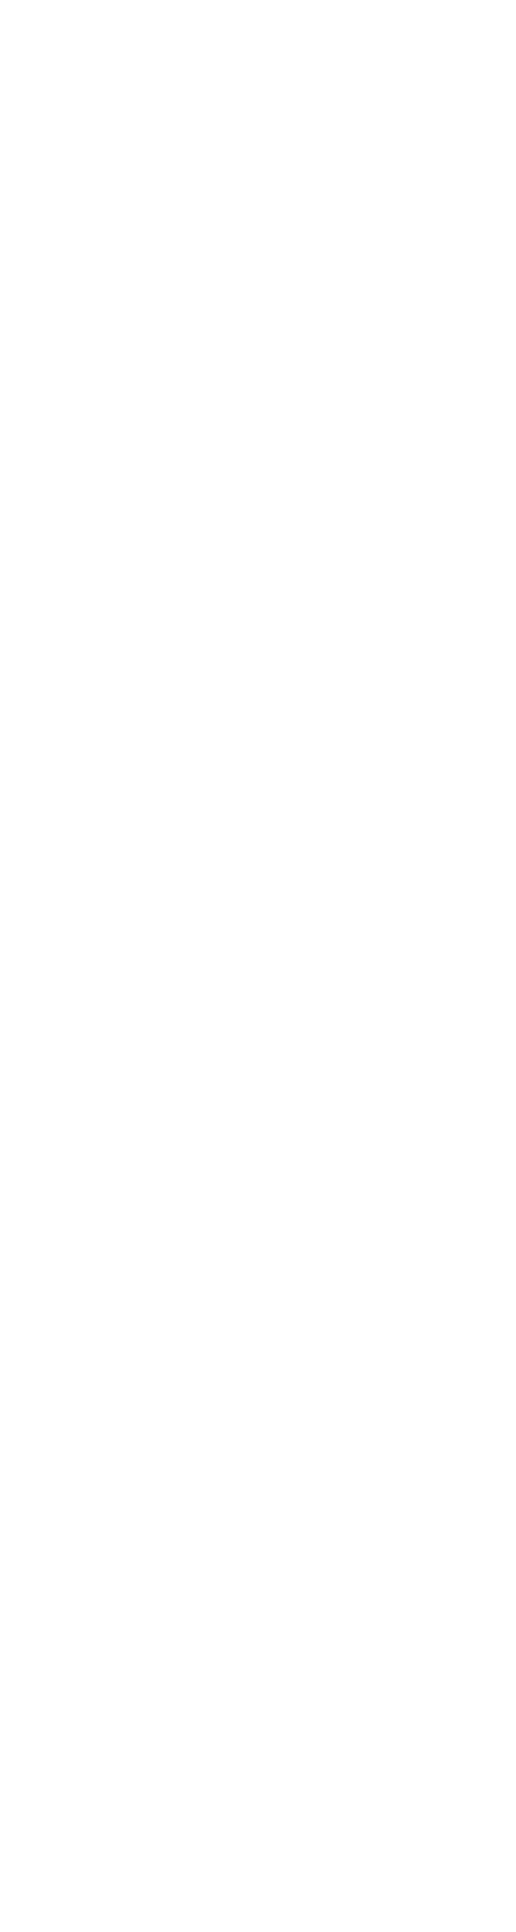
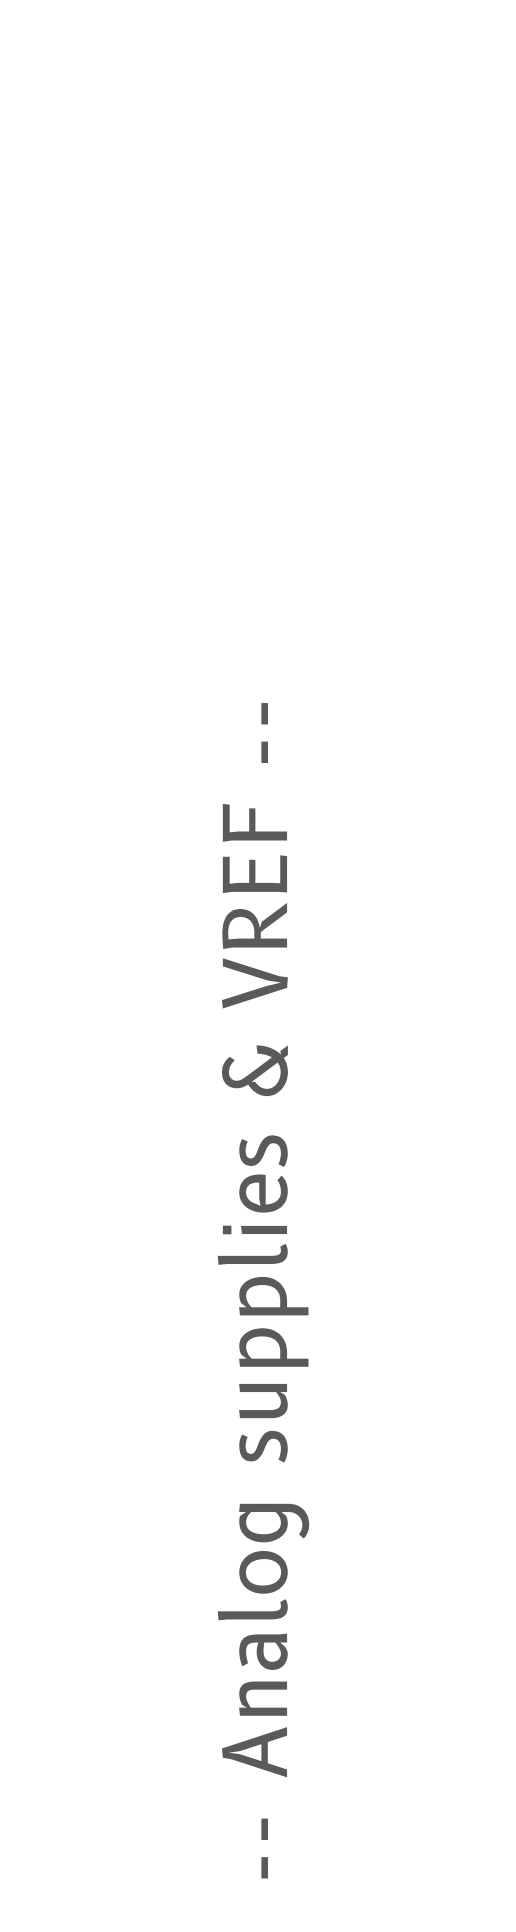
text: none -> -- Analog supplies & VREF -- (263, 1290)

